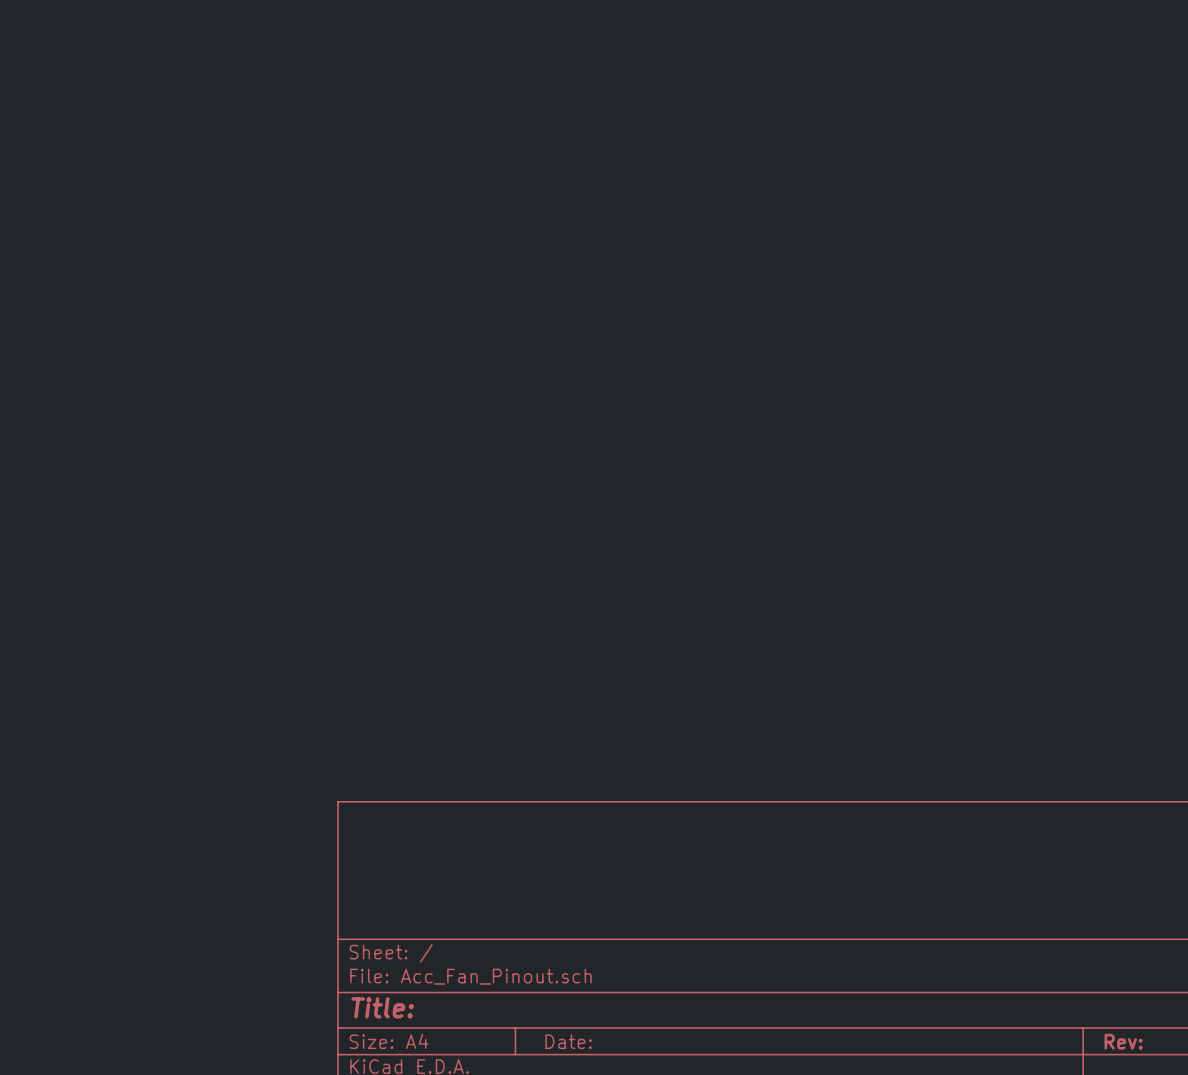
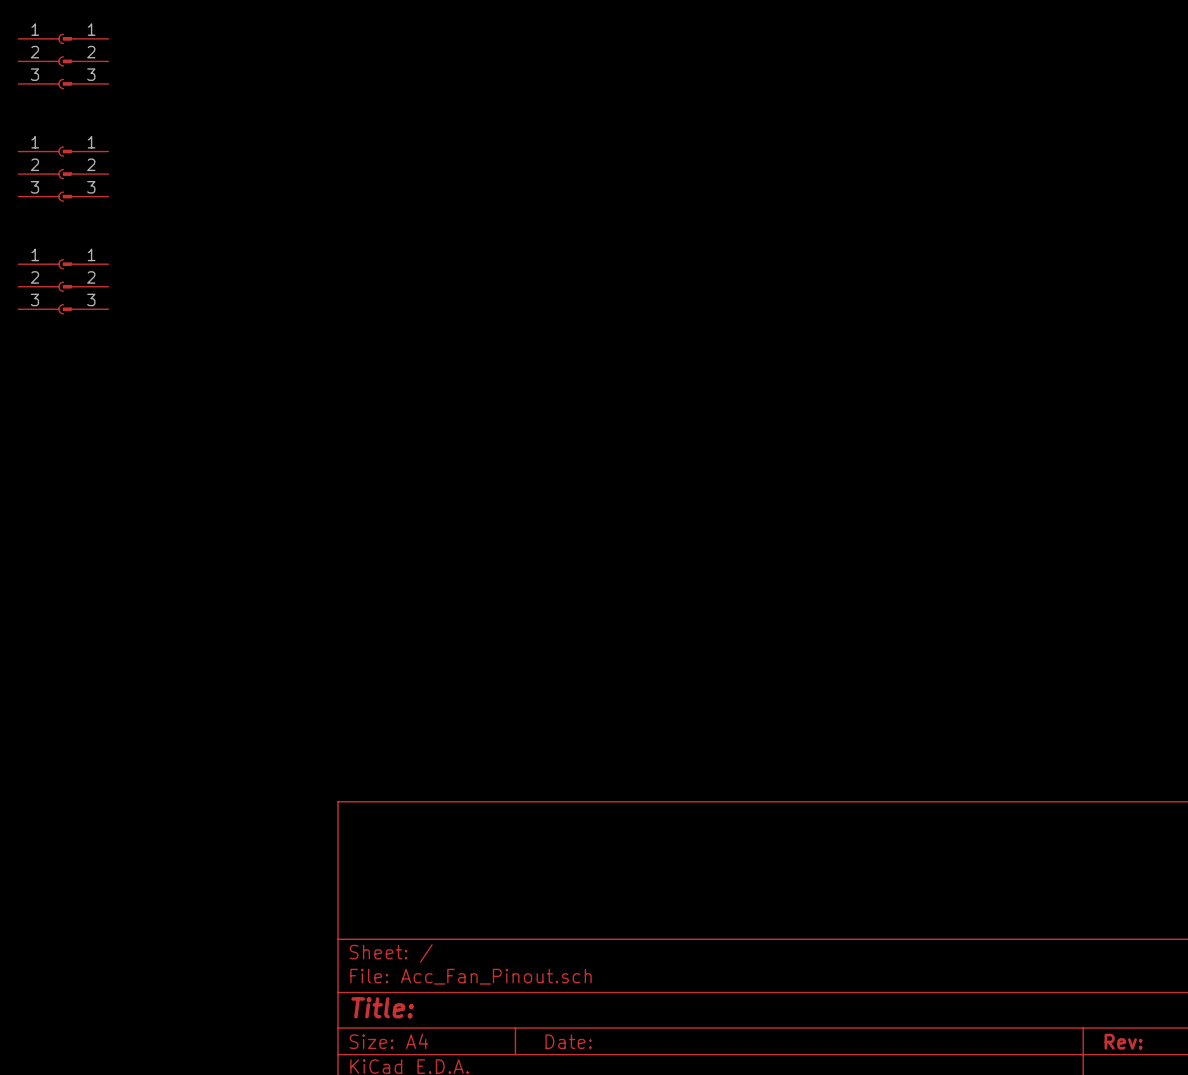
part: none -> (41, 61)
part: none -> (85, 61)
part: none -> (41, 174)
part: none -> (85, 174)
part: none -> (41, 286)
part: none -> (85, 286)

